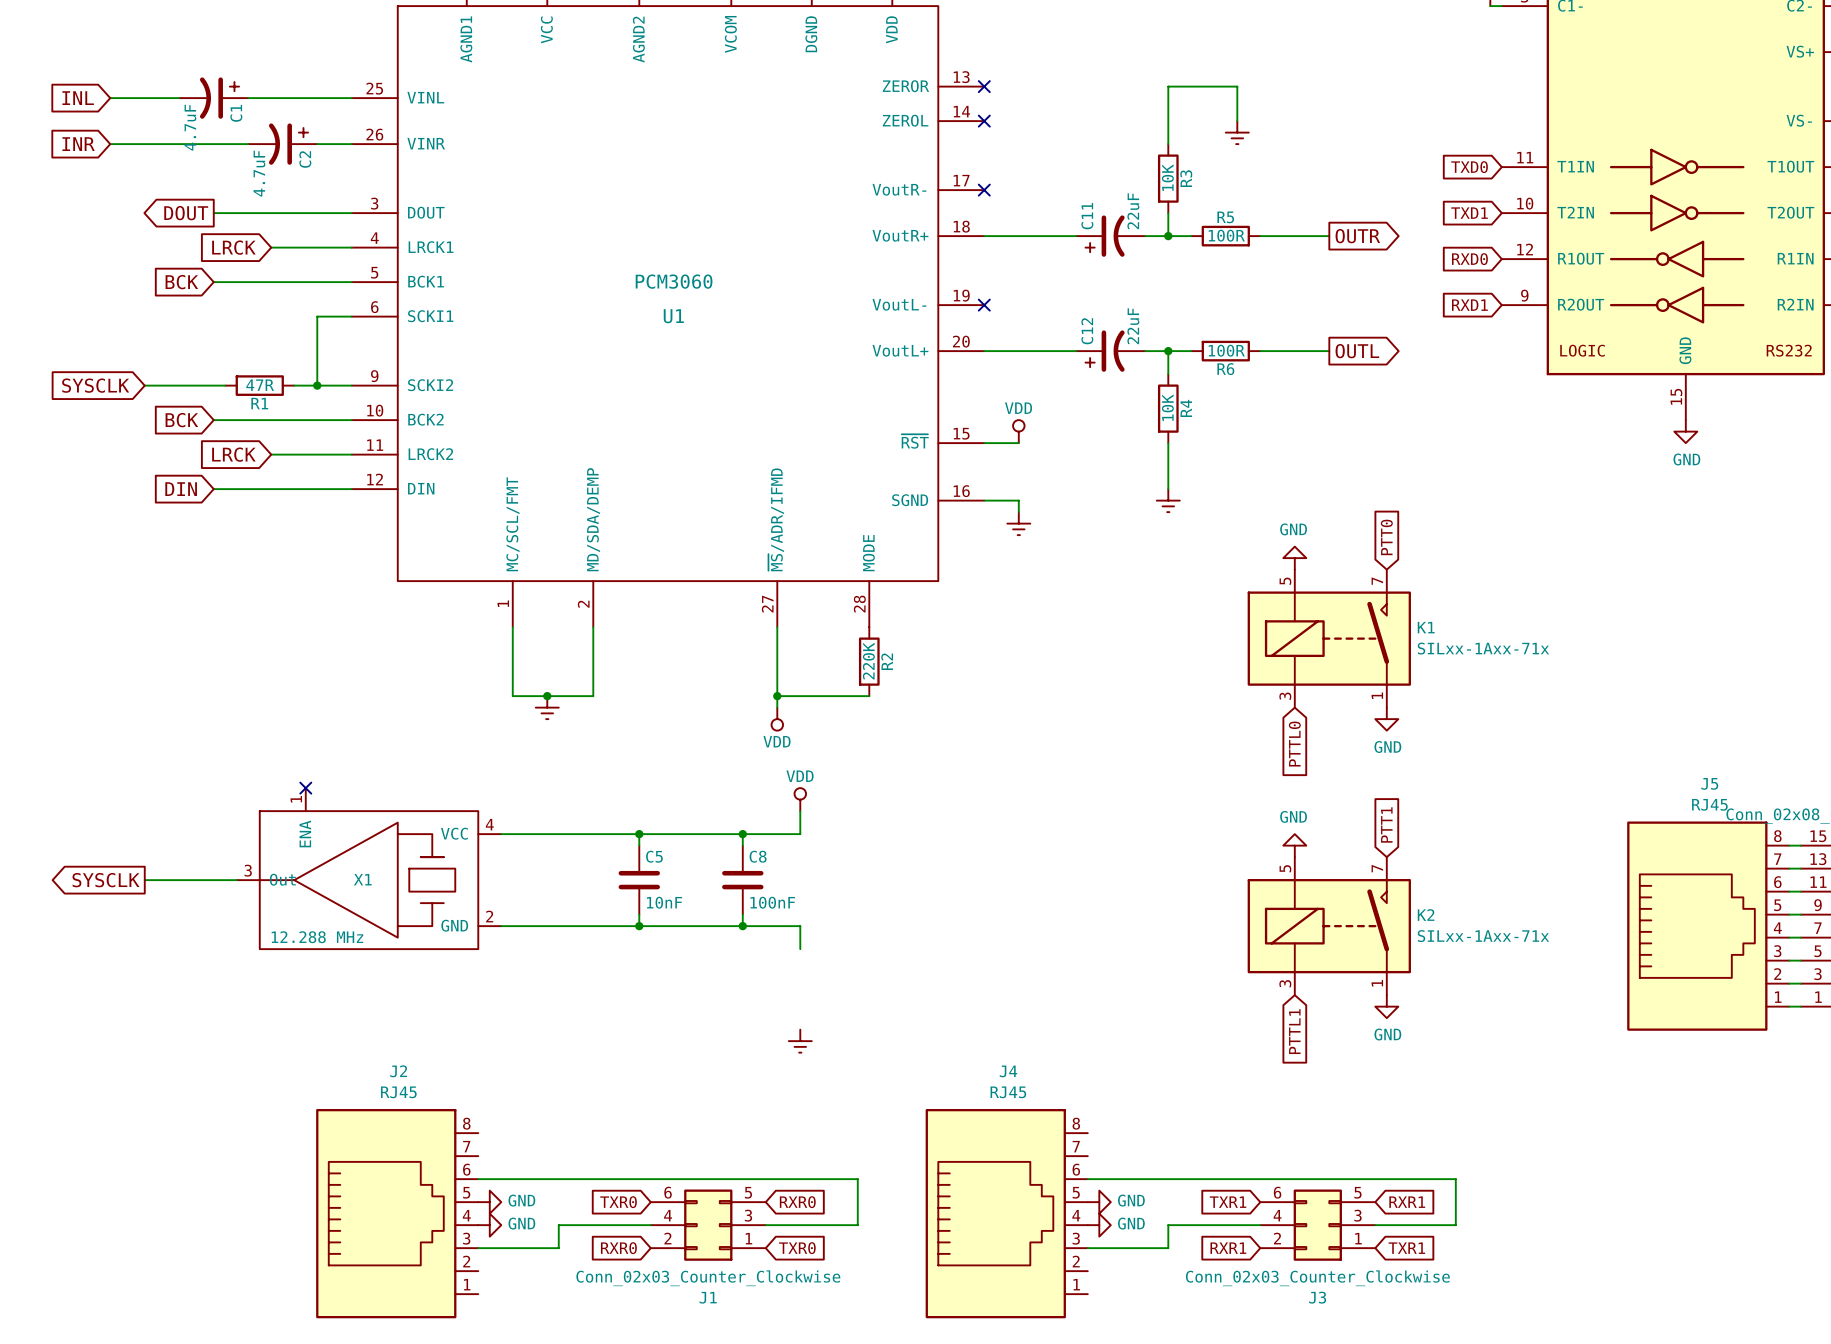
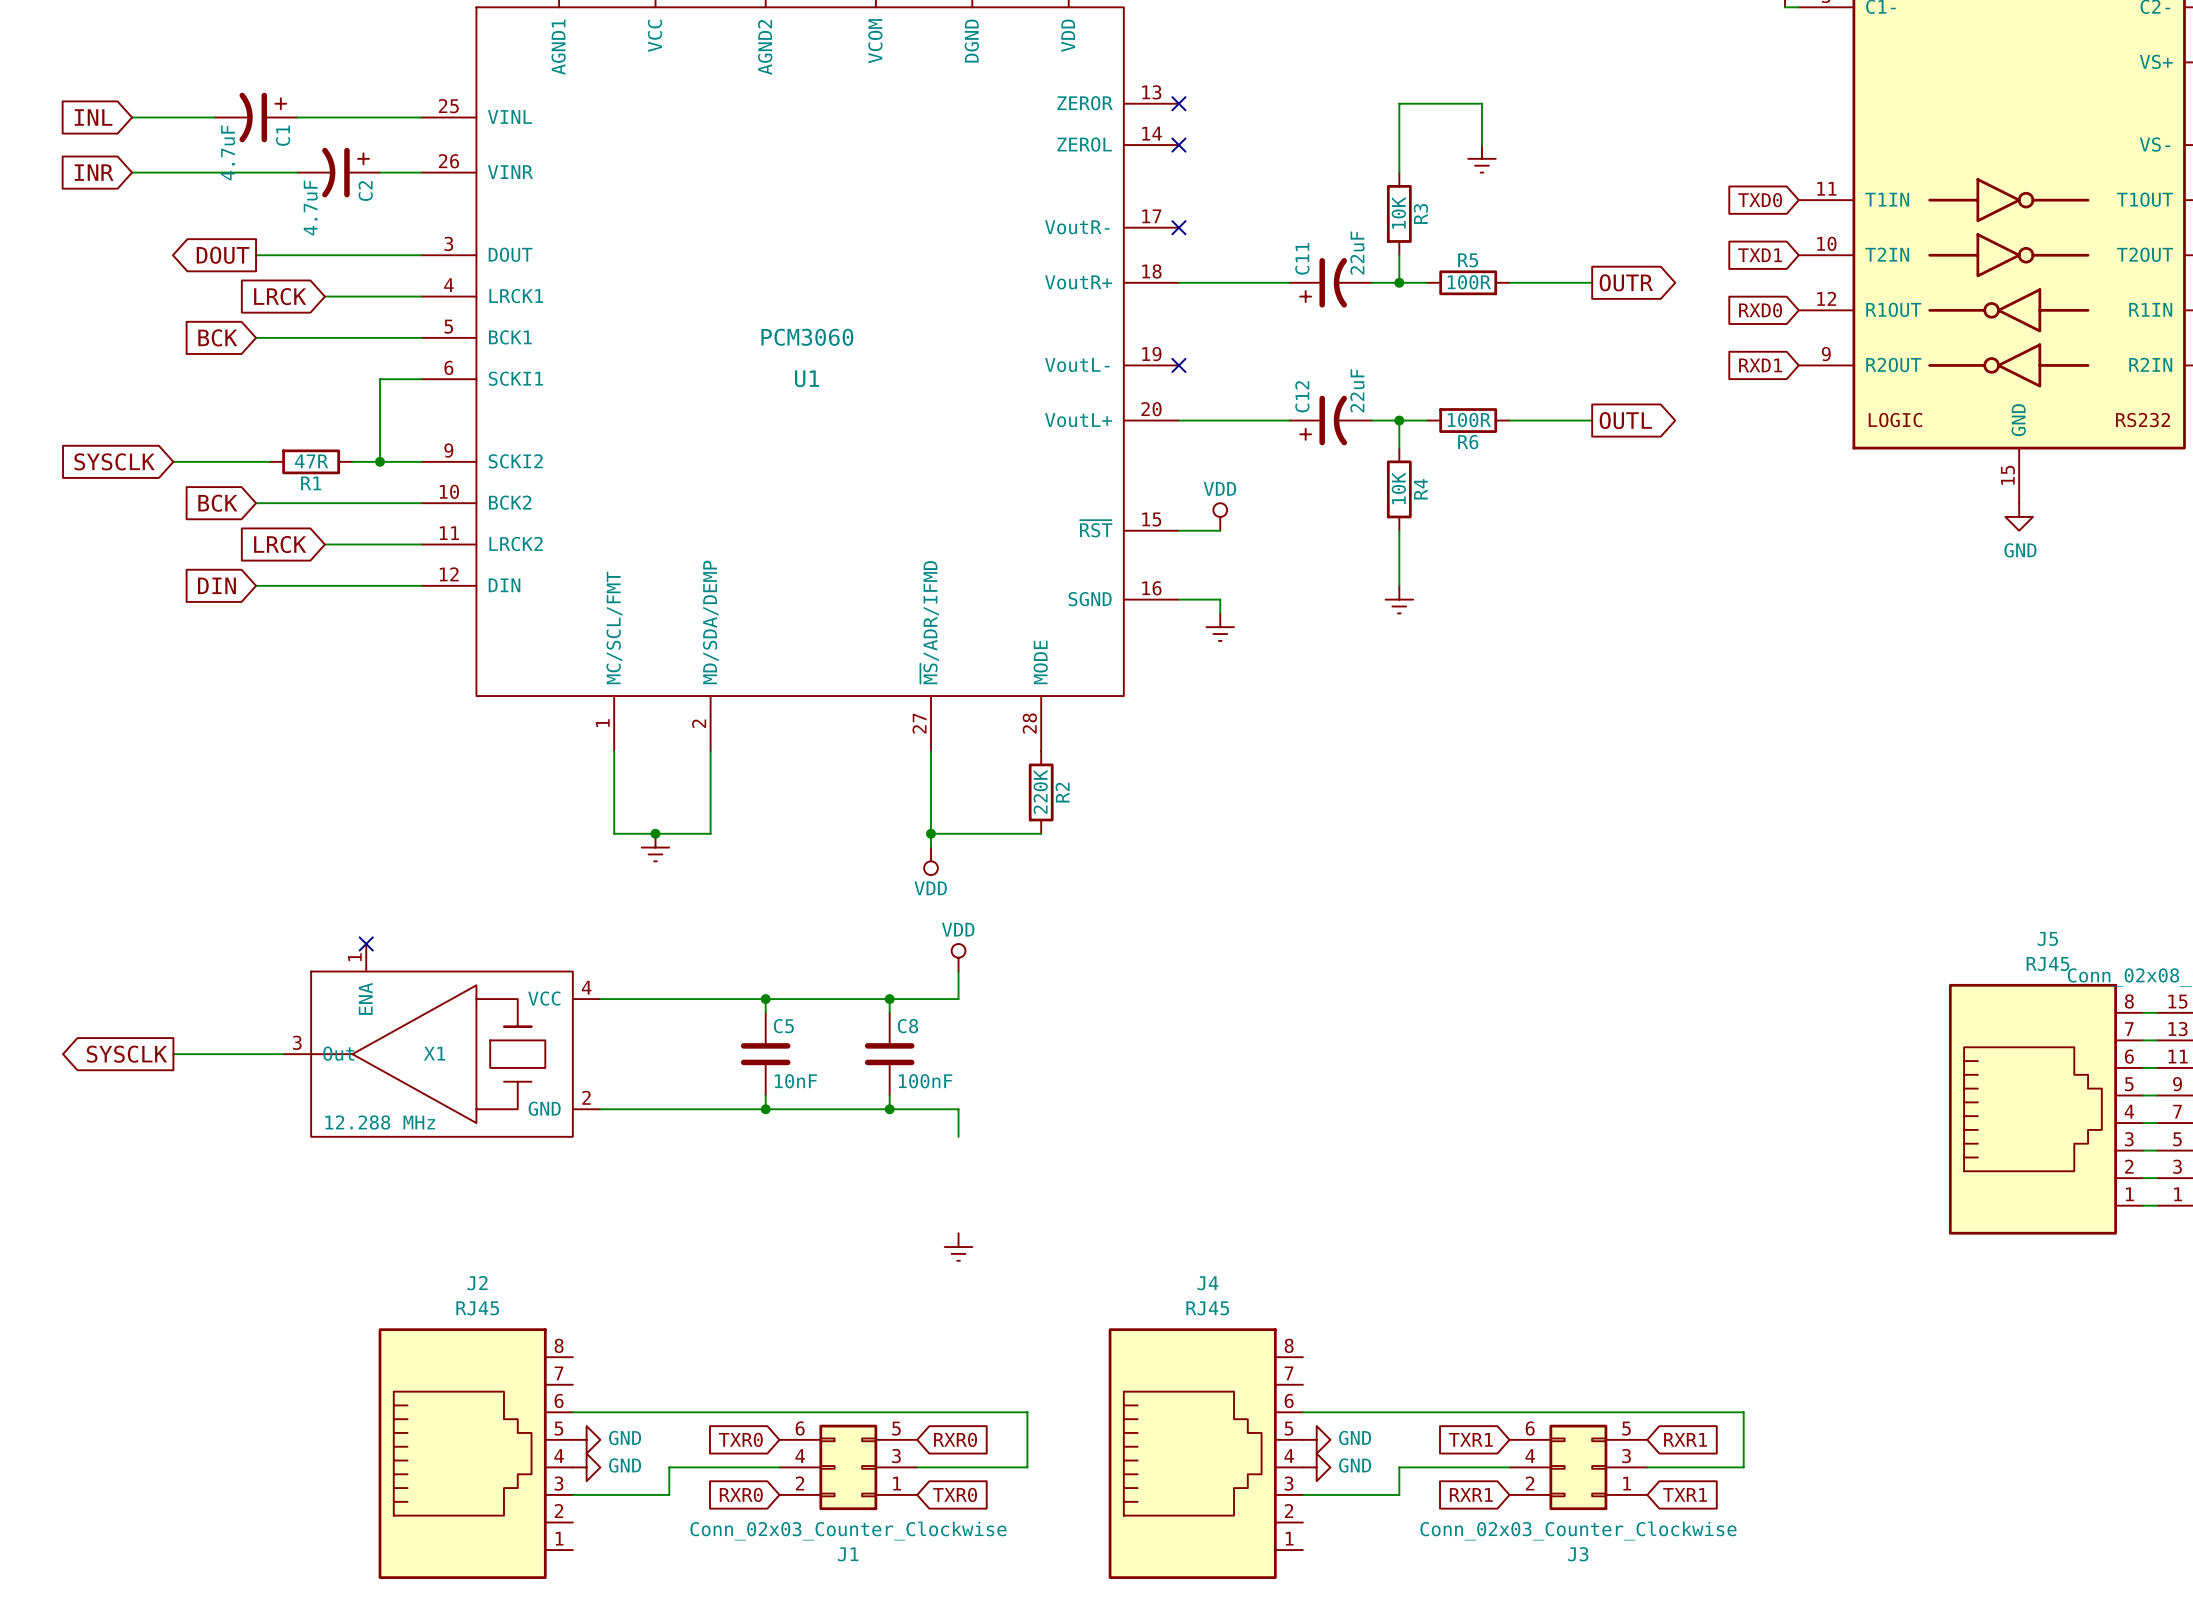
global label: PTT0 (1386, 537) -> none
power symbol: GND (1294, 558) -> none
K1: SILxx-1Axx-71x (1329, 638) -> none
power symbol: GND (1386, 719) -> none
global label: PTTL0 (1294, 744) -> none
global label: PTT1 (1386, 824) -> none
power symbol: GND (1294, 845) -> none
K2: SILxx-1Axx-71x (1329, 926) -> none
power symbol: GND (1386, 1006) -> none
global label: PTTL1 (1294, 1031) -> none

